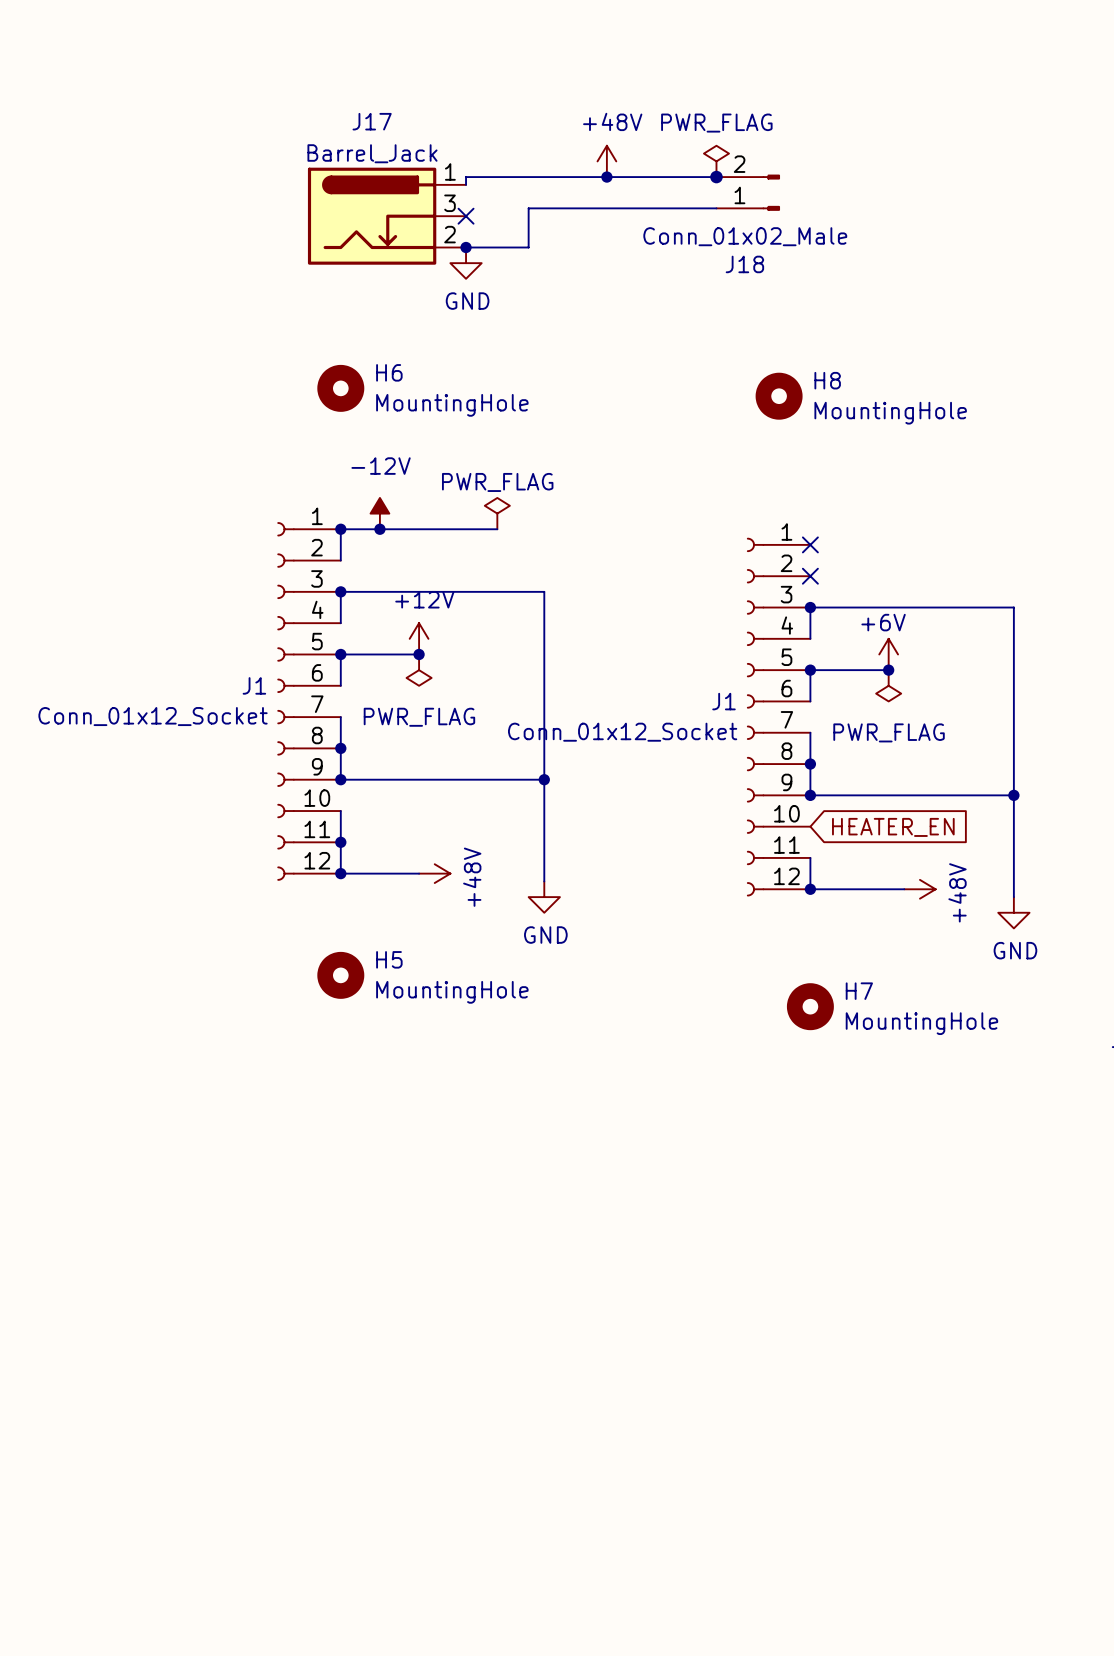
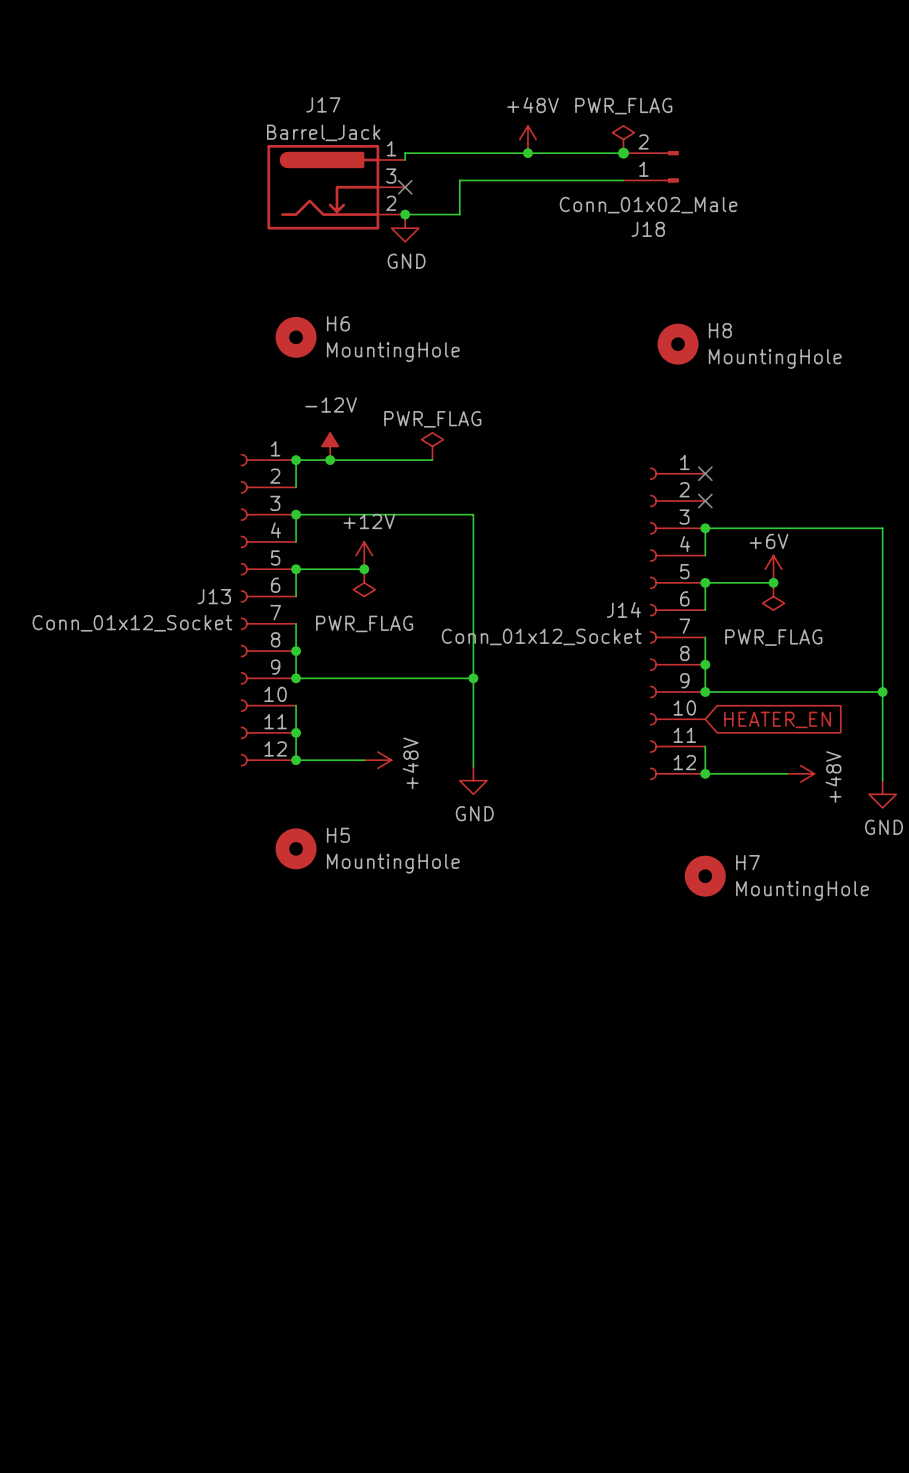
J1 name: J1 (254, 685) -> J13 (214, 596)
J1 name: J1 (723, 701) -> J14 (623, 609)

